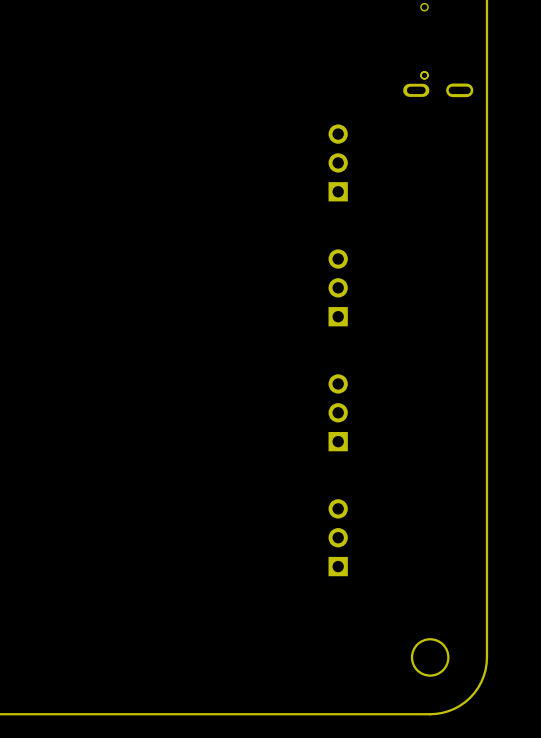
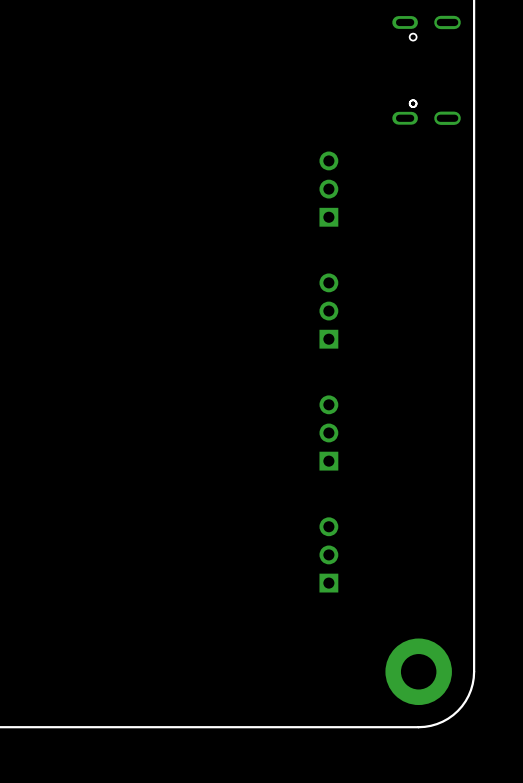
round board edge: [410, 638, 450, 677] -> none
part: none -> (418, 671)

